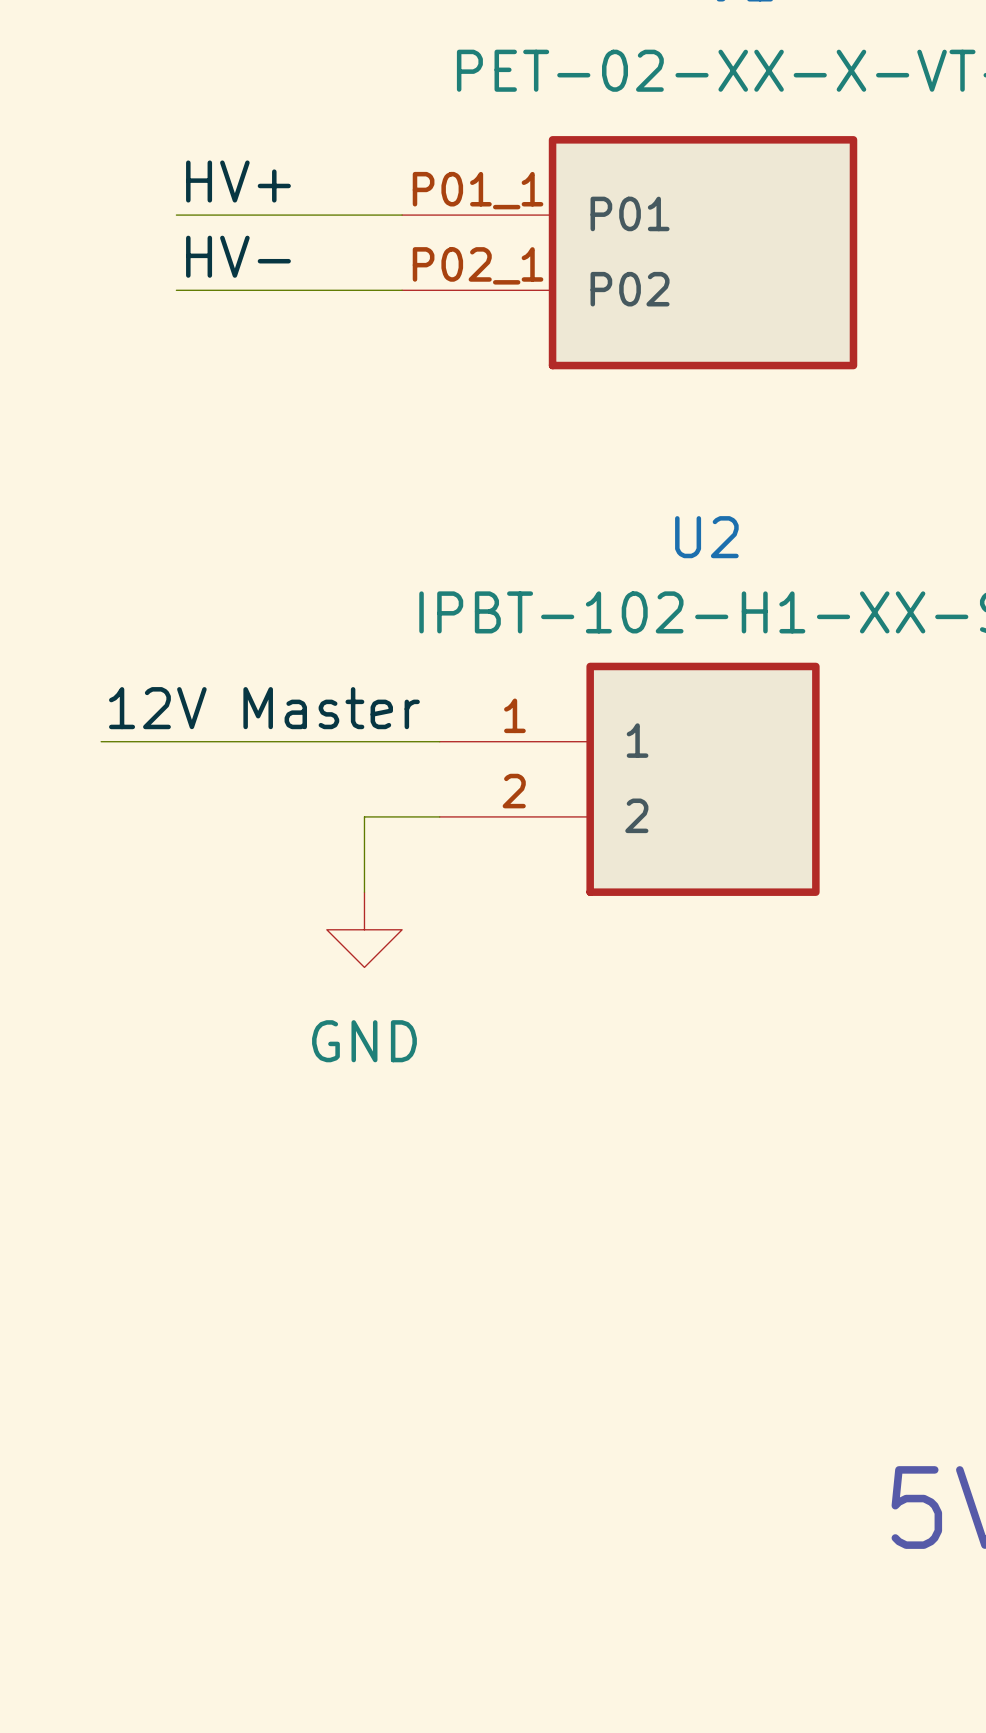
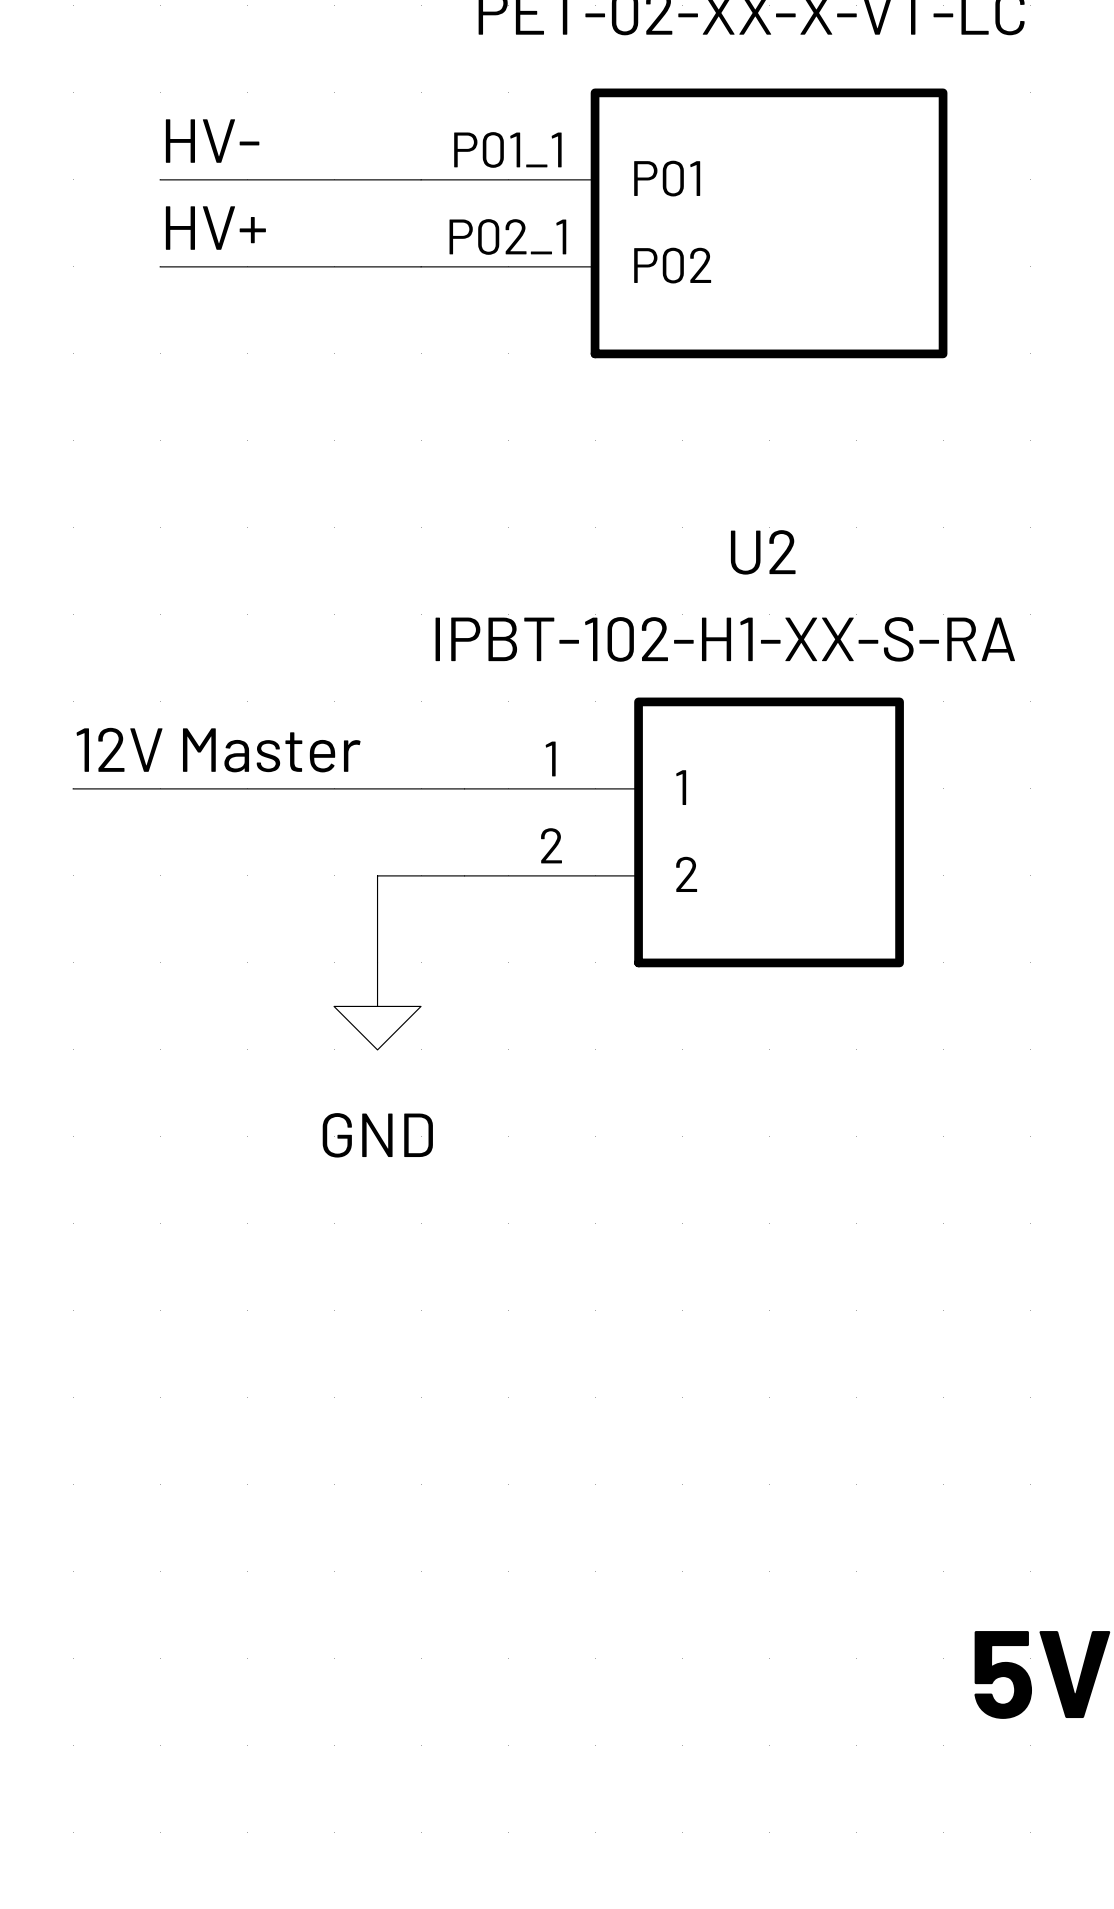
label: HV+ (238, 181) -> HV- (212, 141)
label: HV- (238, 256) -> HV+ (215, 228)

